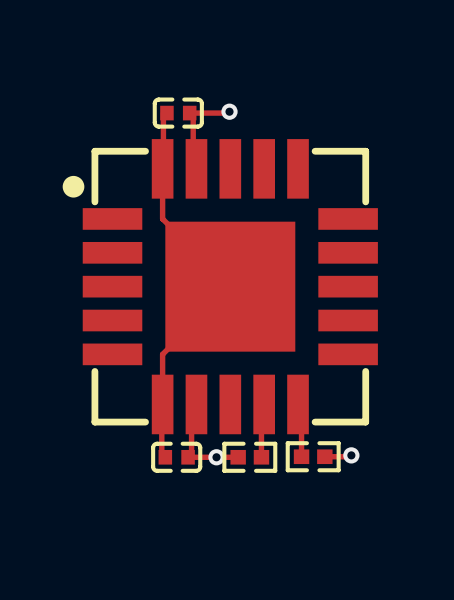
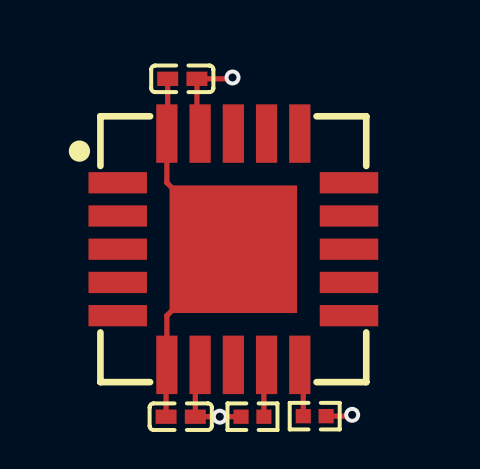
part footprint: [152, 97, 204, 129] -> [149, 63, 216, 95]
part footprint: [151, 441, 203, 473] -> [147, 401, 214, 432]

